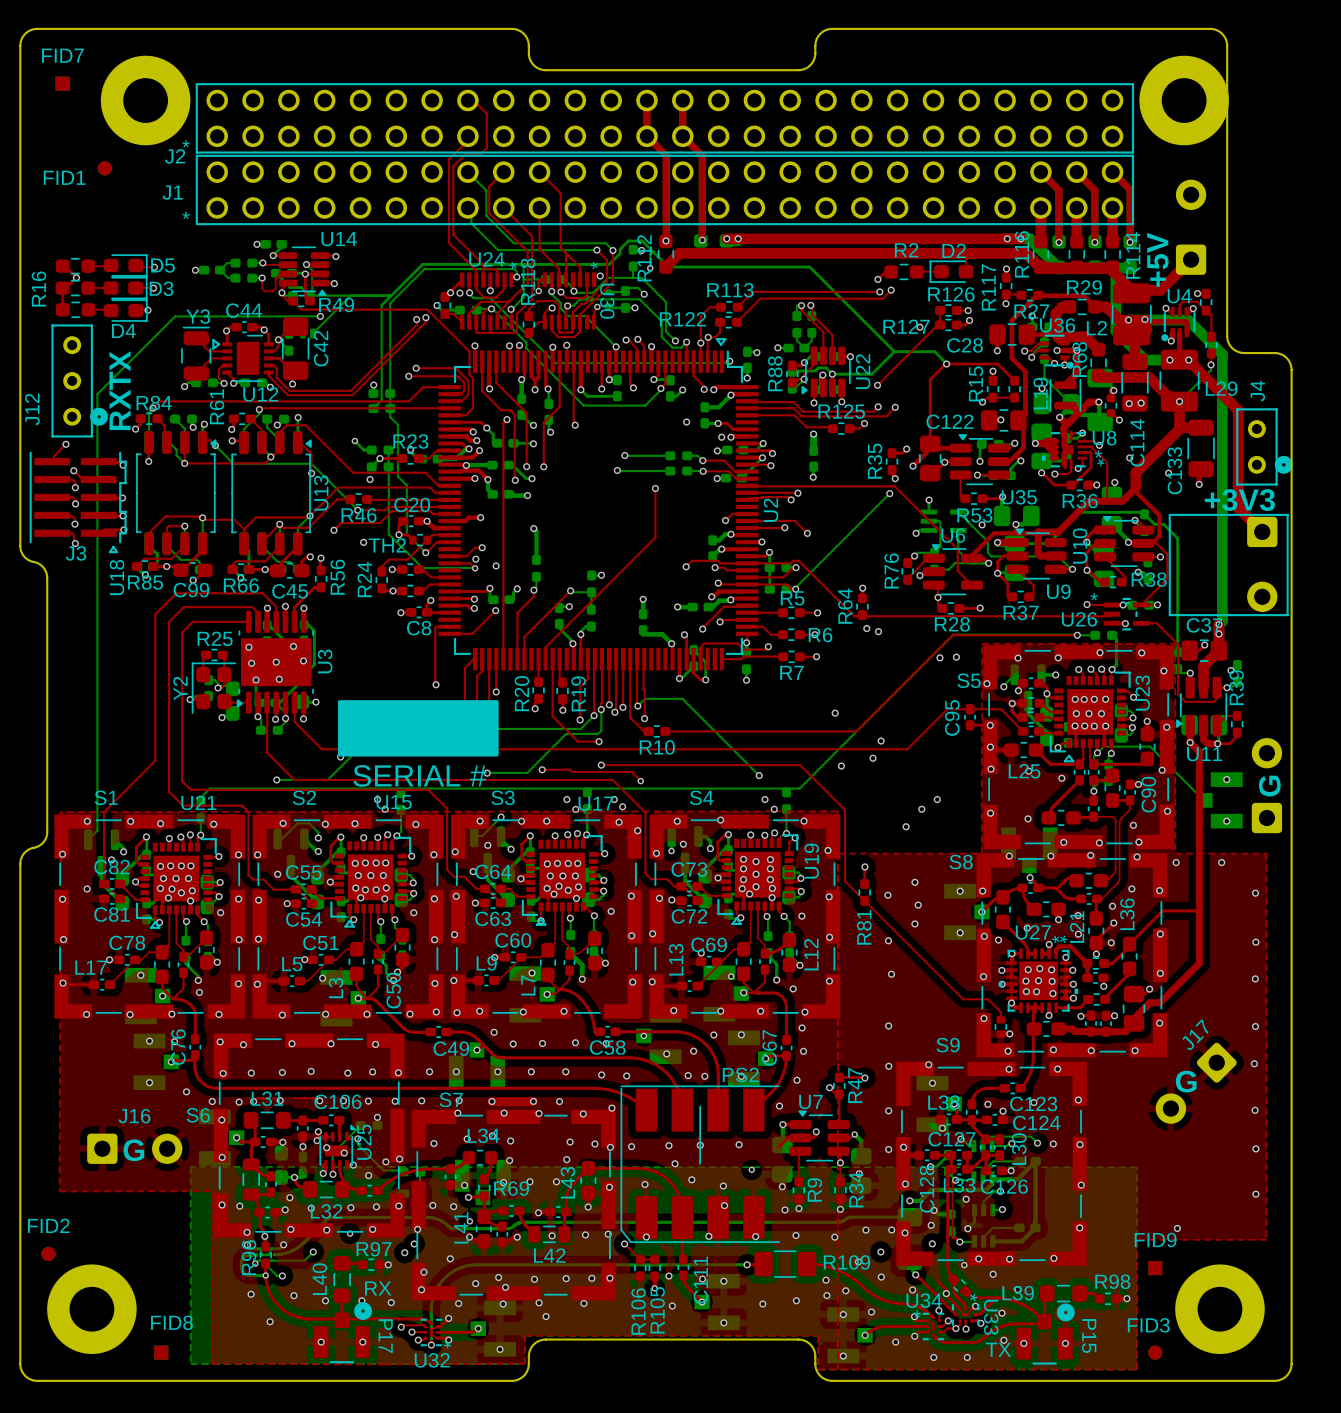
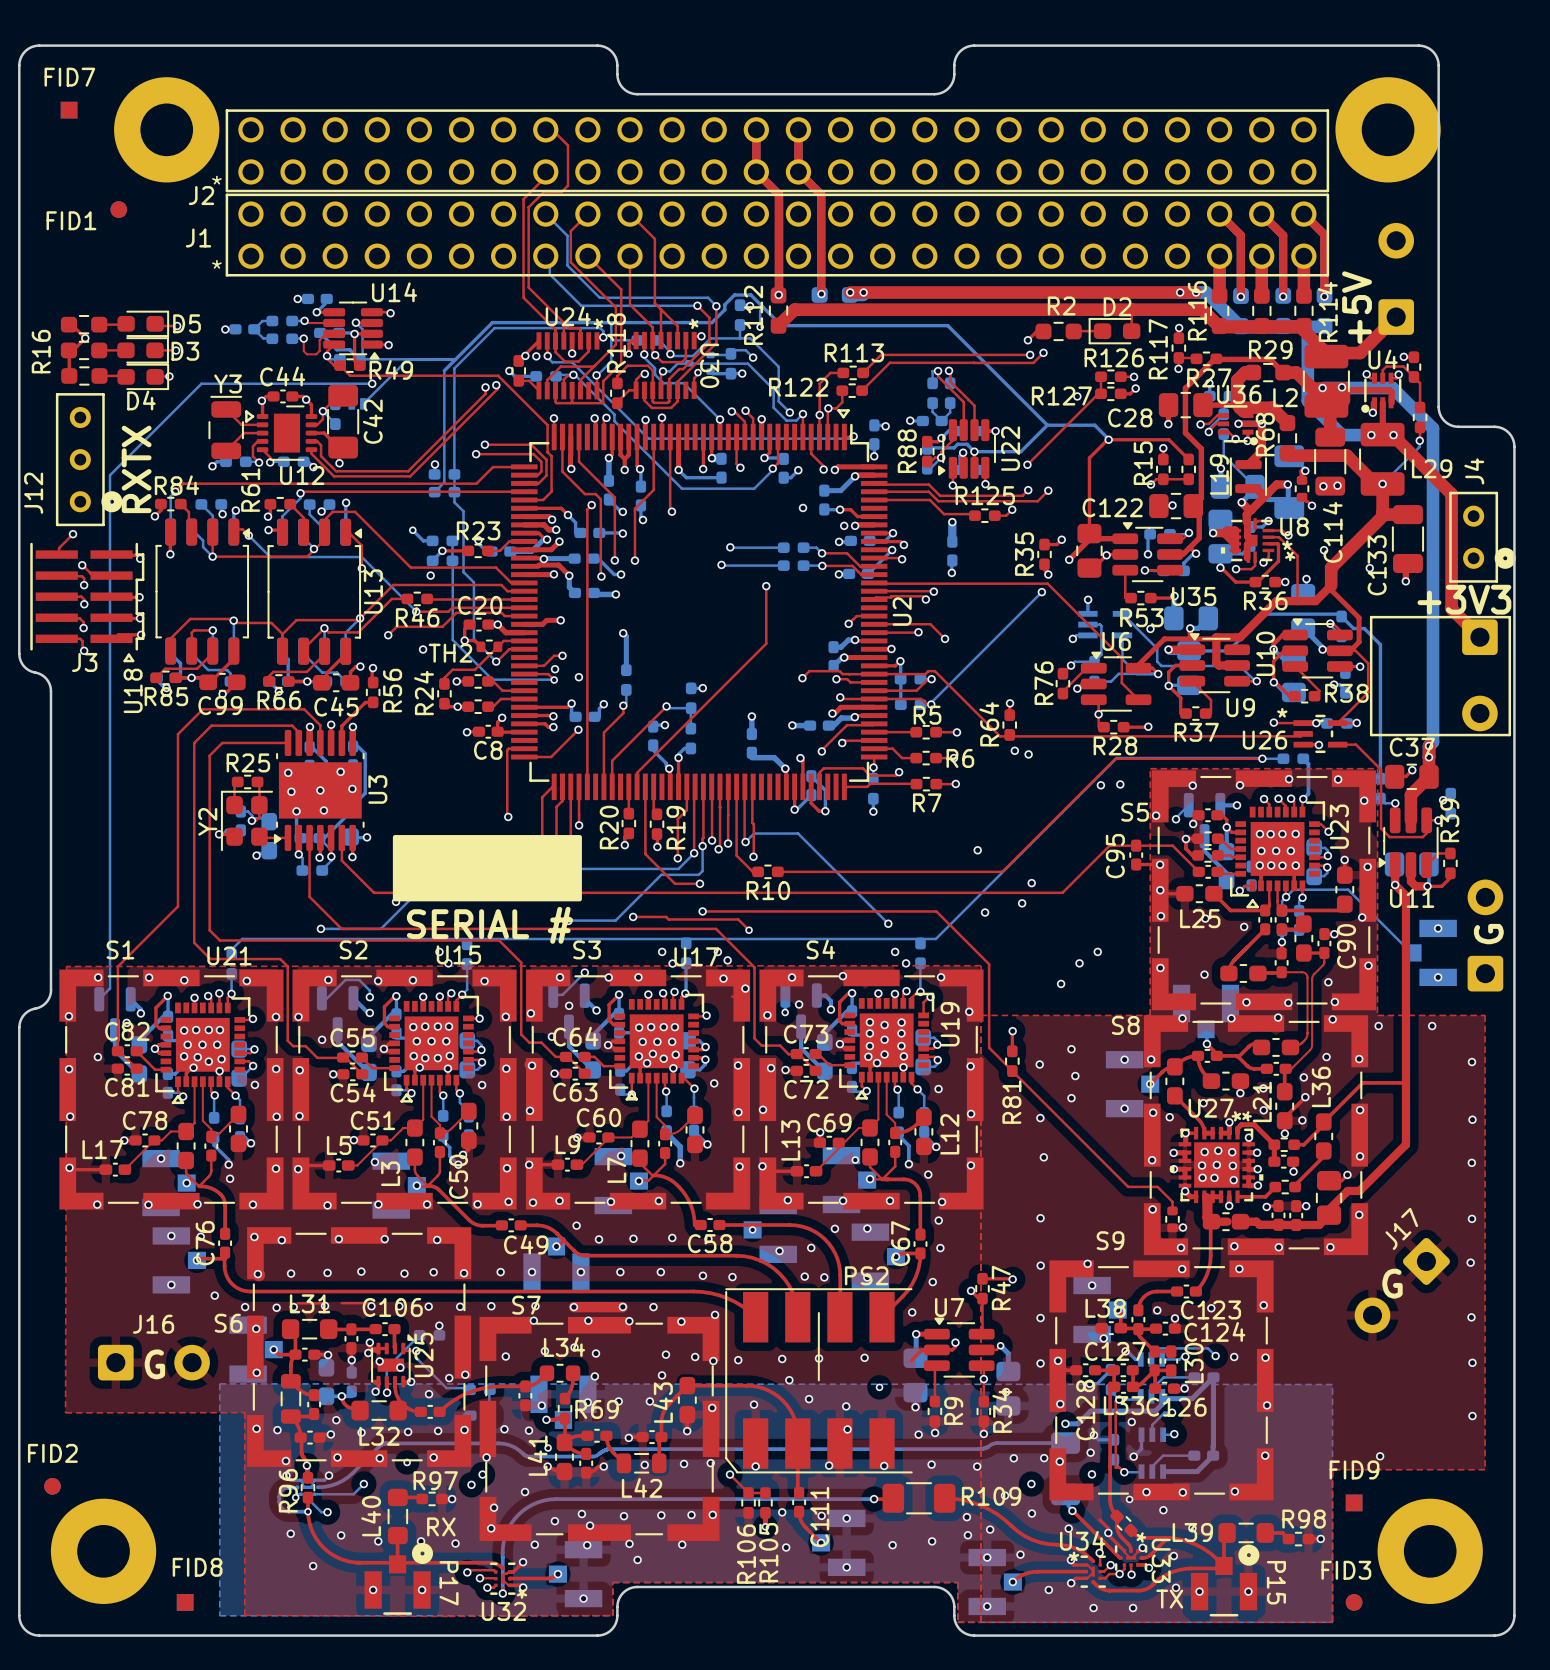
top track: none -> (1206, 1197) (1206, 1217) (1210, 1221) (1227, 1221)

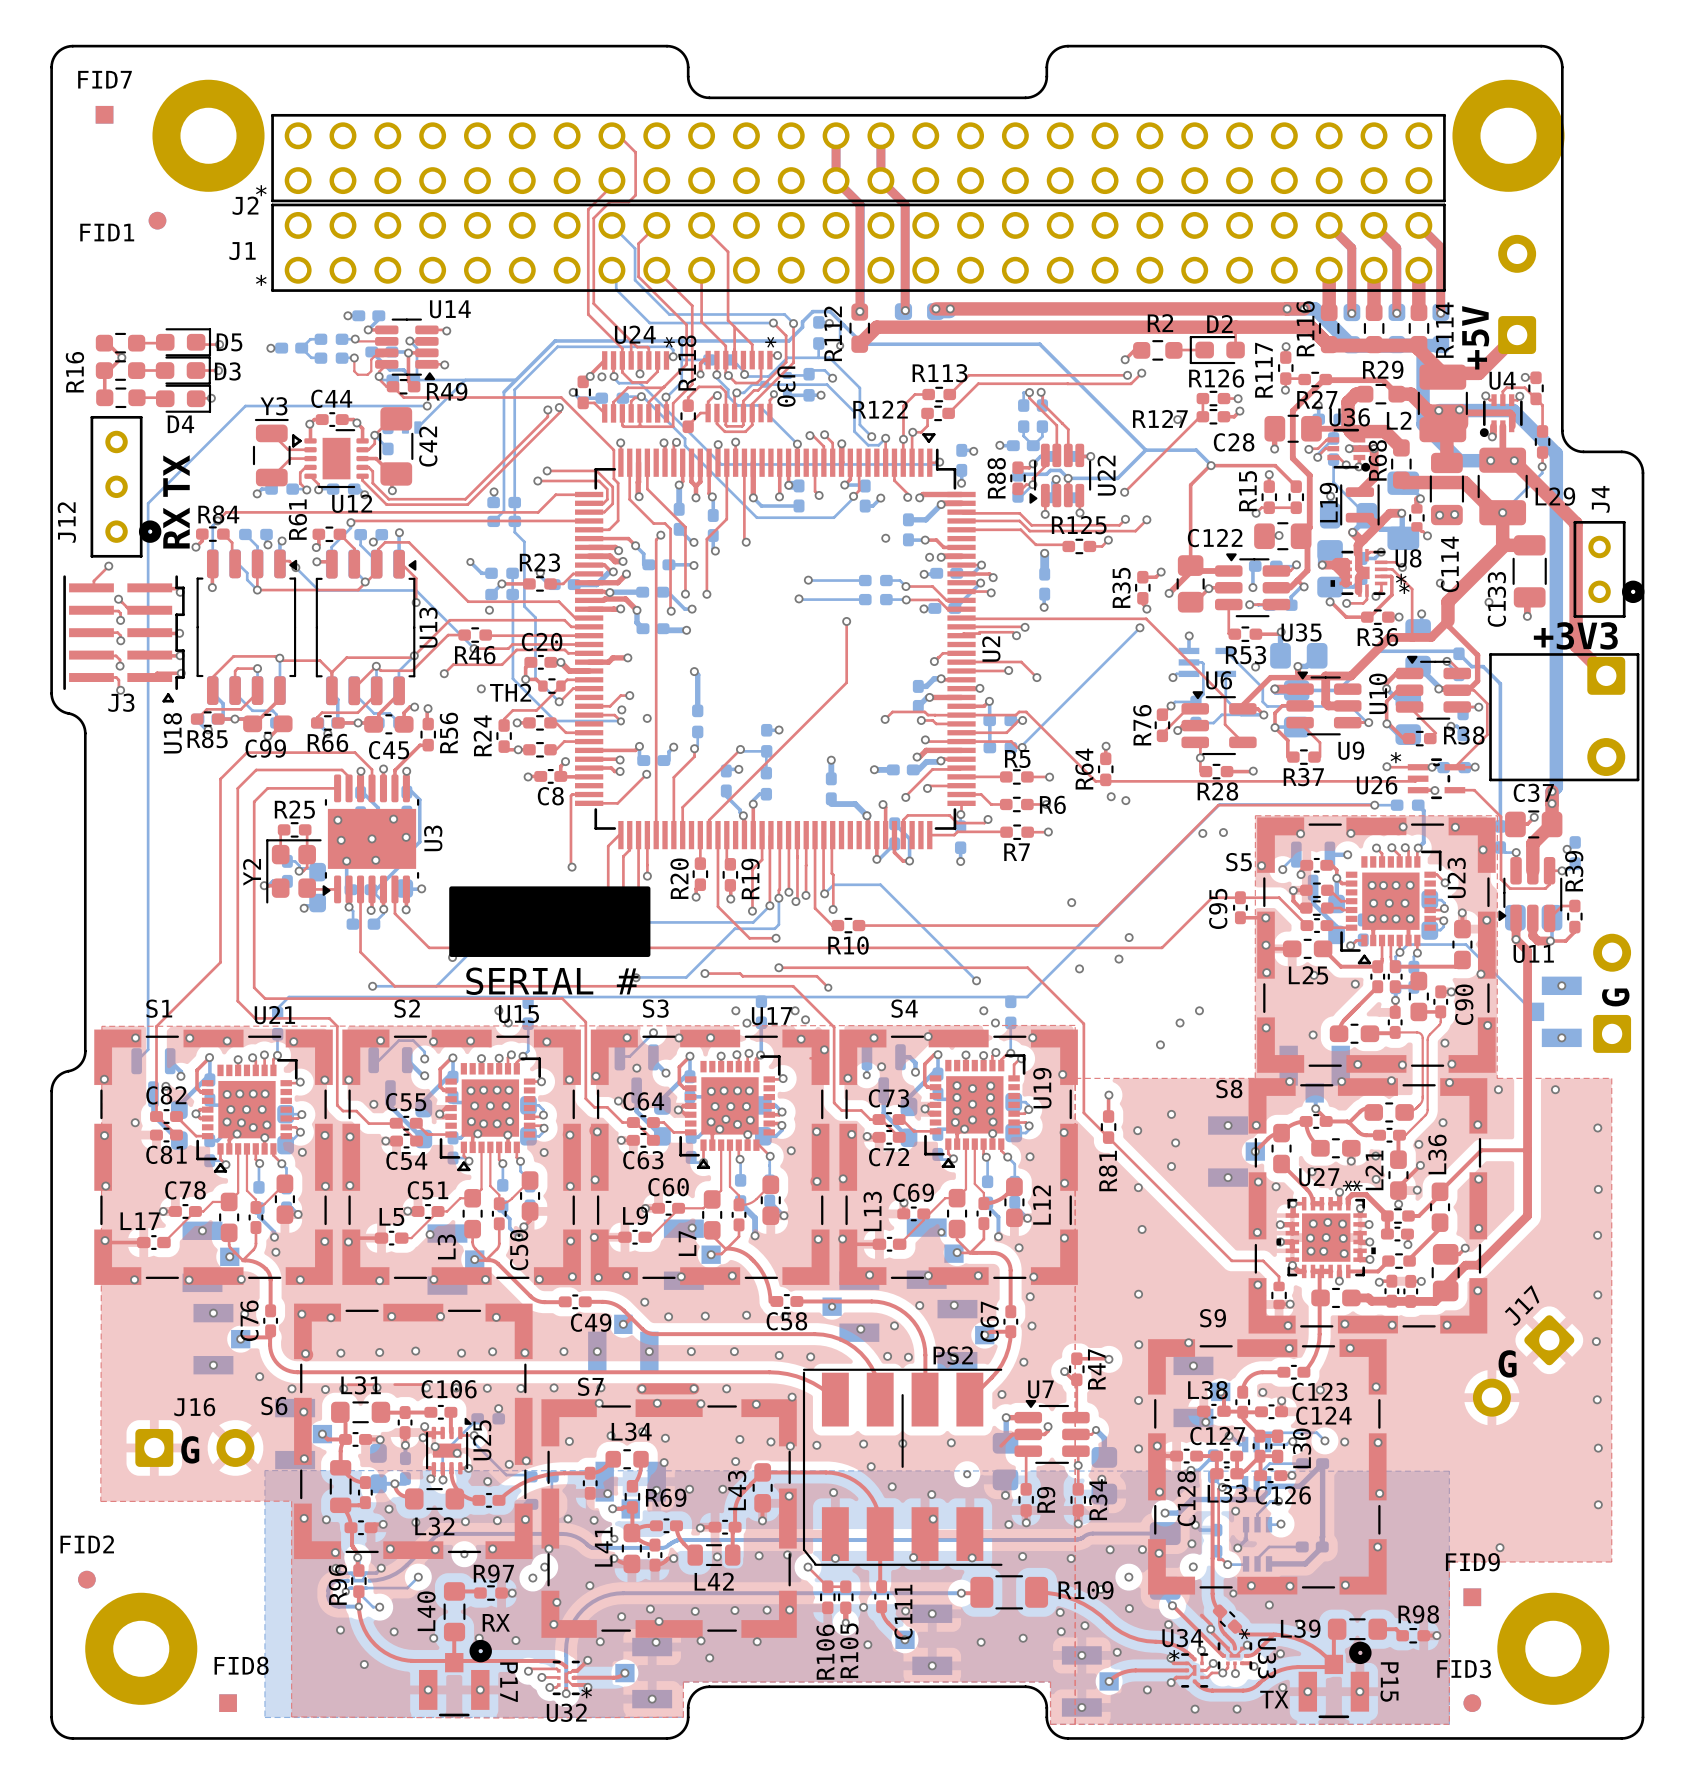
top track: (1206, 1197) (1206, 1217) (1210, 1221) (1227, 1221) -> none

